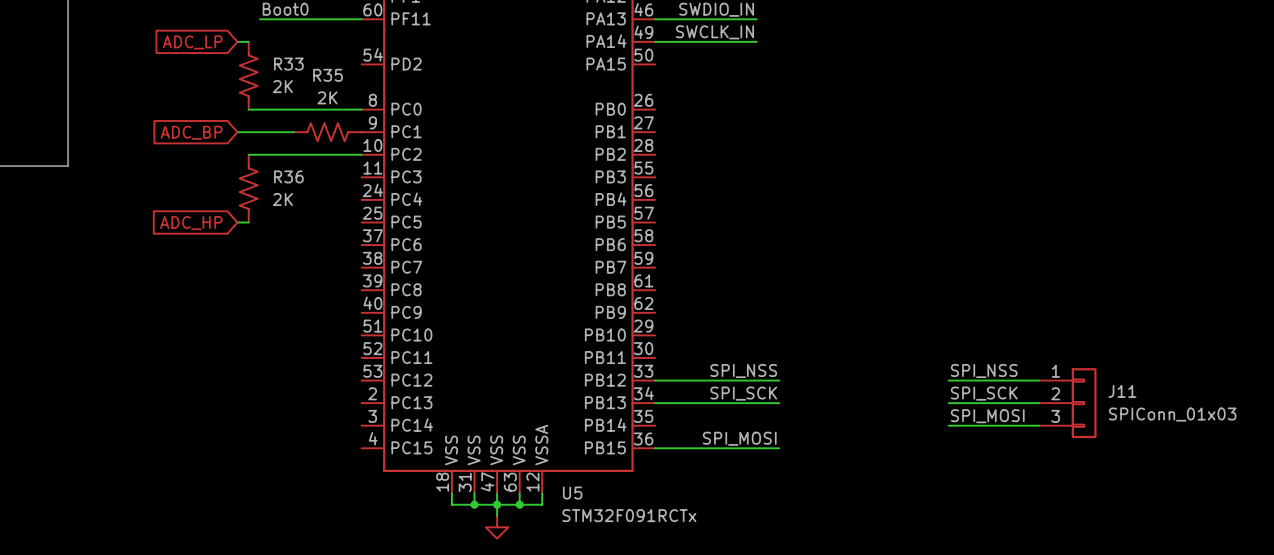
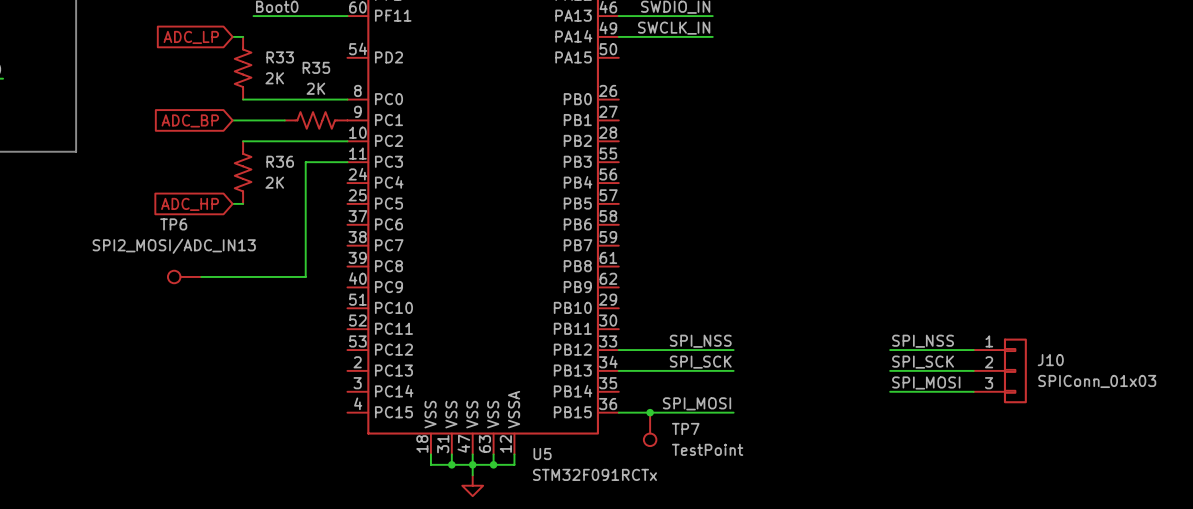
wire: none -> (347, 162) (305, 162) (305, 276) (201, 276)
TP6: none -> SPI2_MOSI/ADC_IN13 (184, 276)
J11 name: J11 (1122, 391) -> J10 (1050, 360)
junction: none -> (650, 412)
TP7: none -> TestPoint (650, 429)

